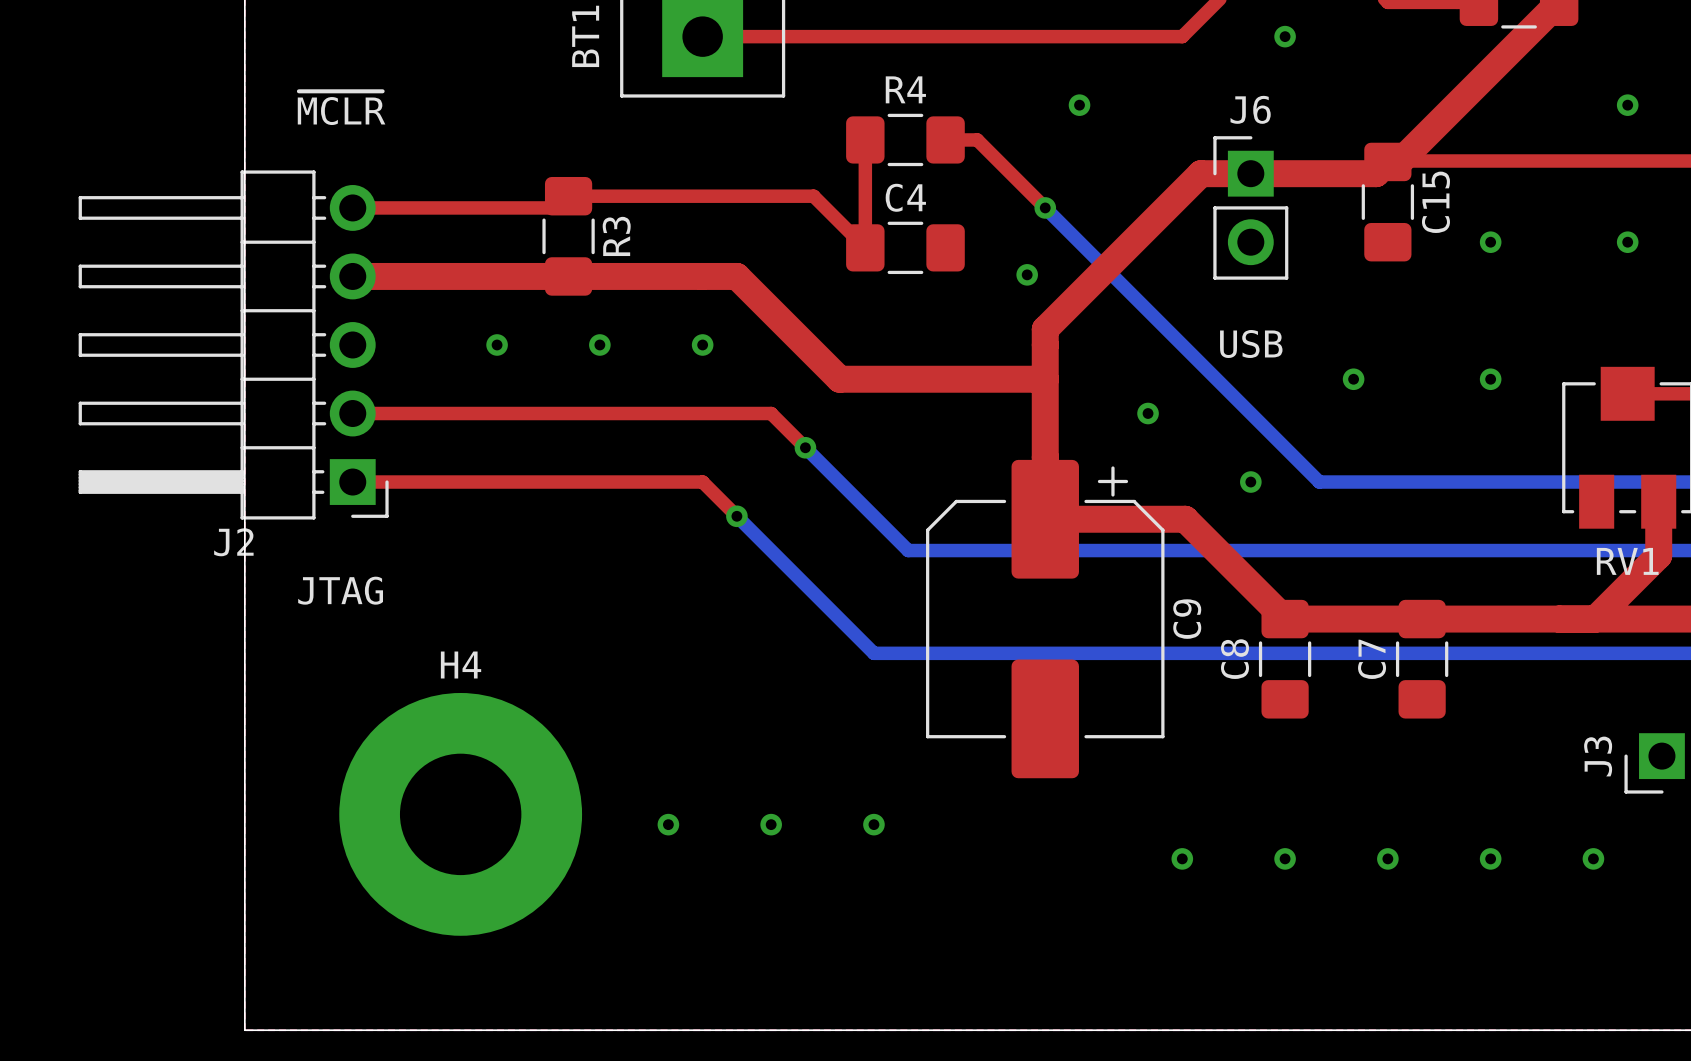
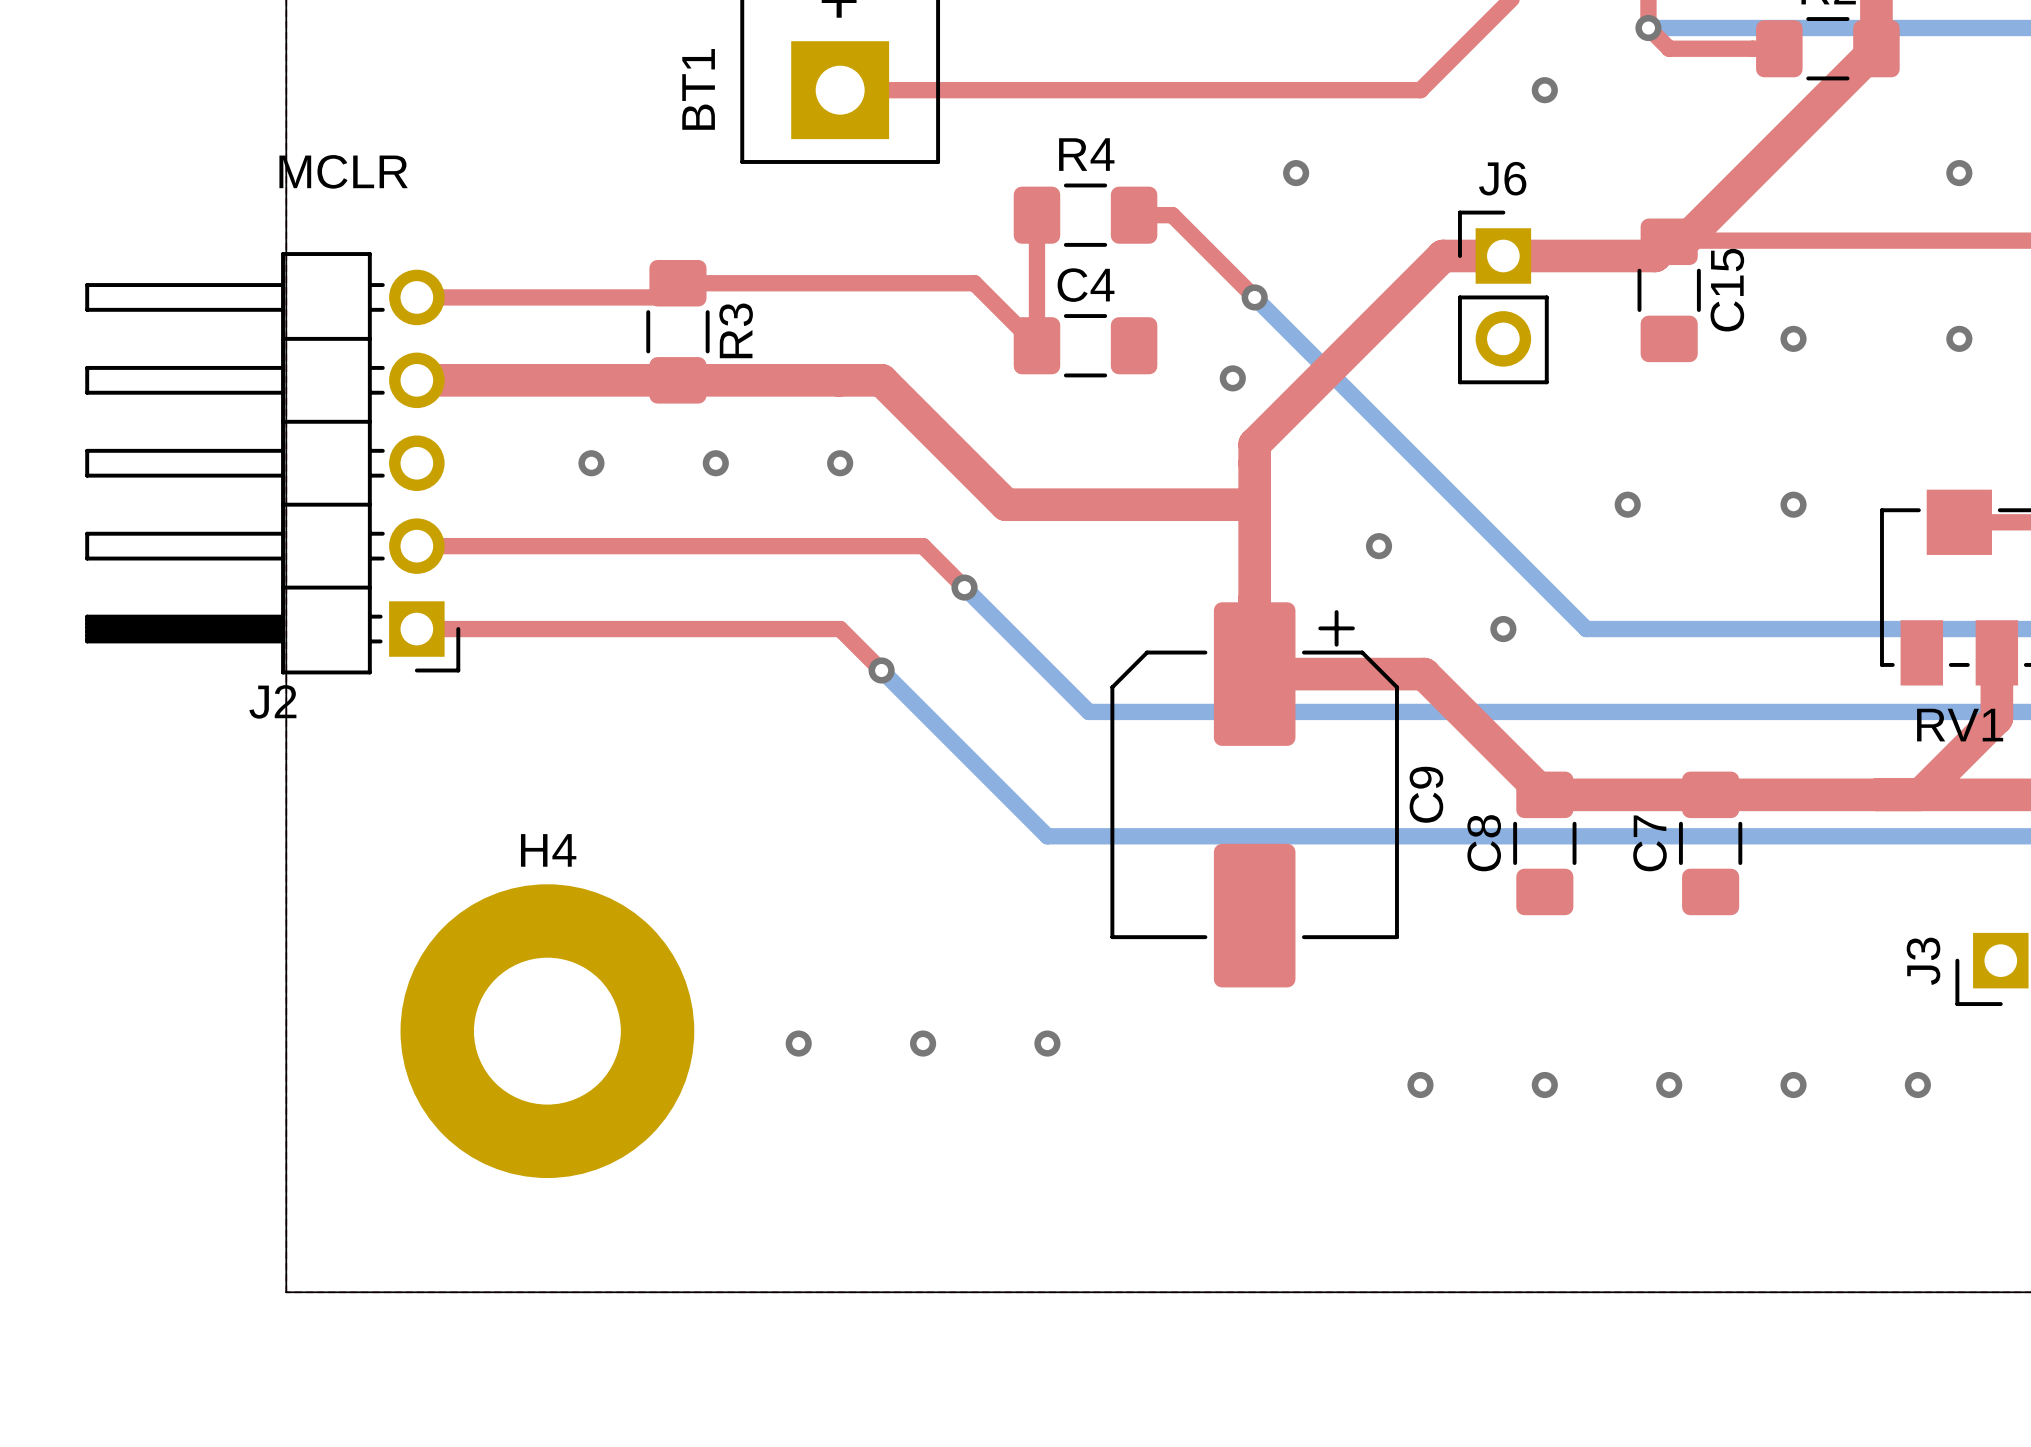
text: ~{MCLR} (341, 108) -> MCLR (343, 171)
J6 value: USB (1251, 343) -> none
J2 value: JTAG (340, 590) -> none

